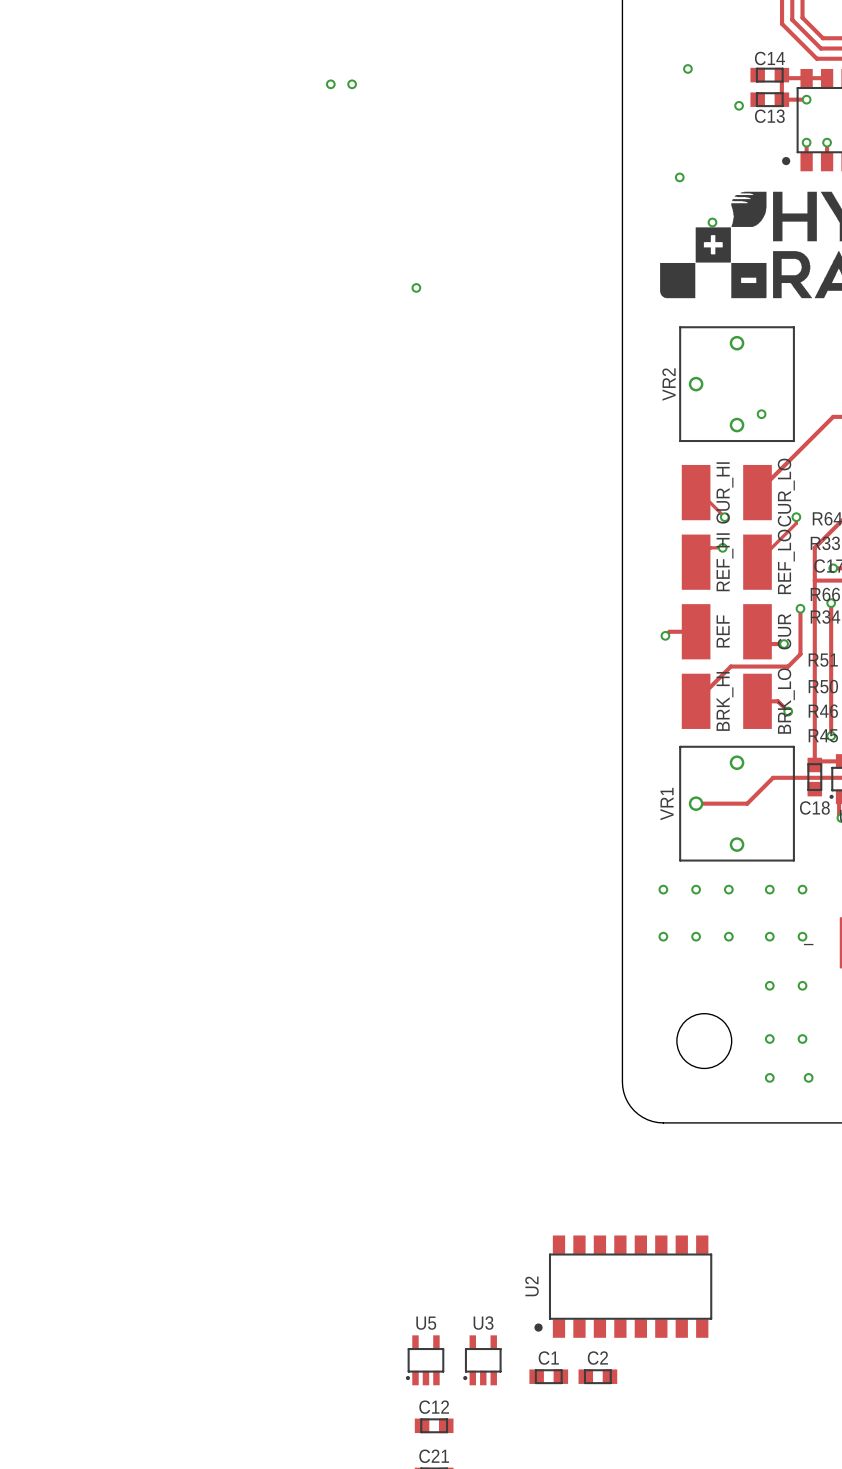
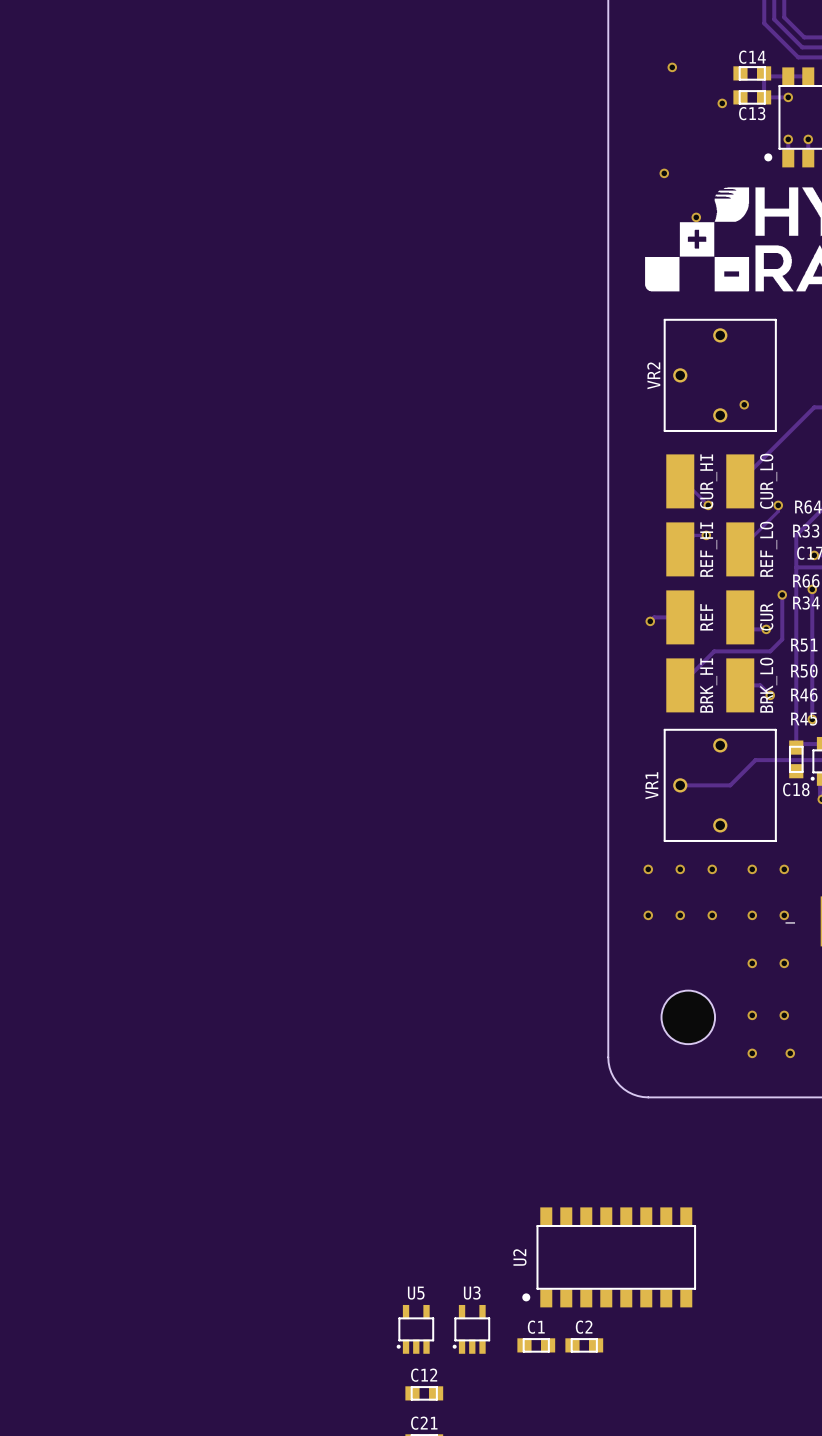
via: (330, 84) -> none
via: (352, 84) -> none
via: (416, 287) -> none

